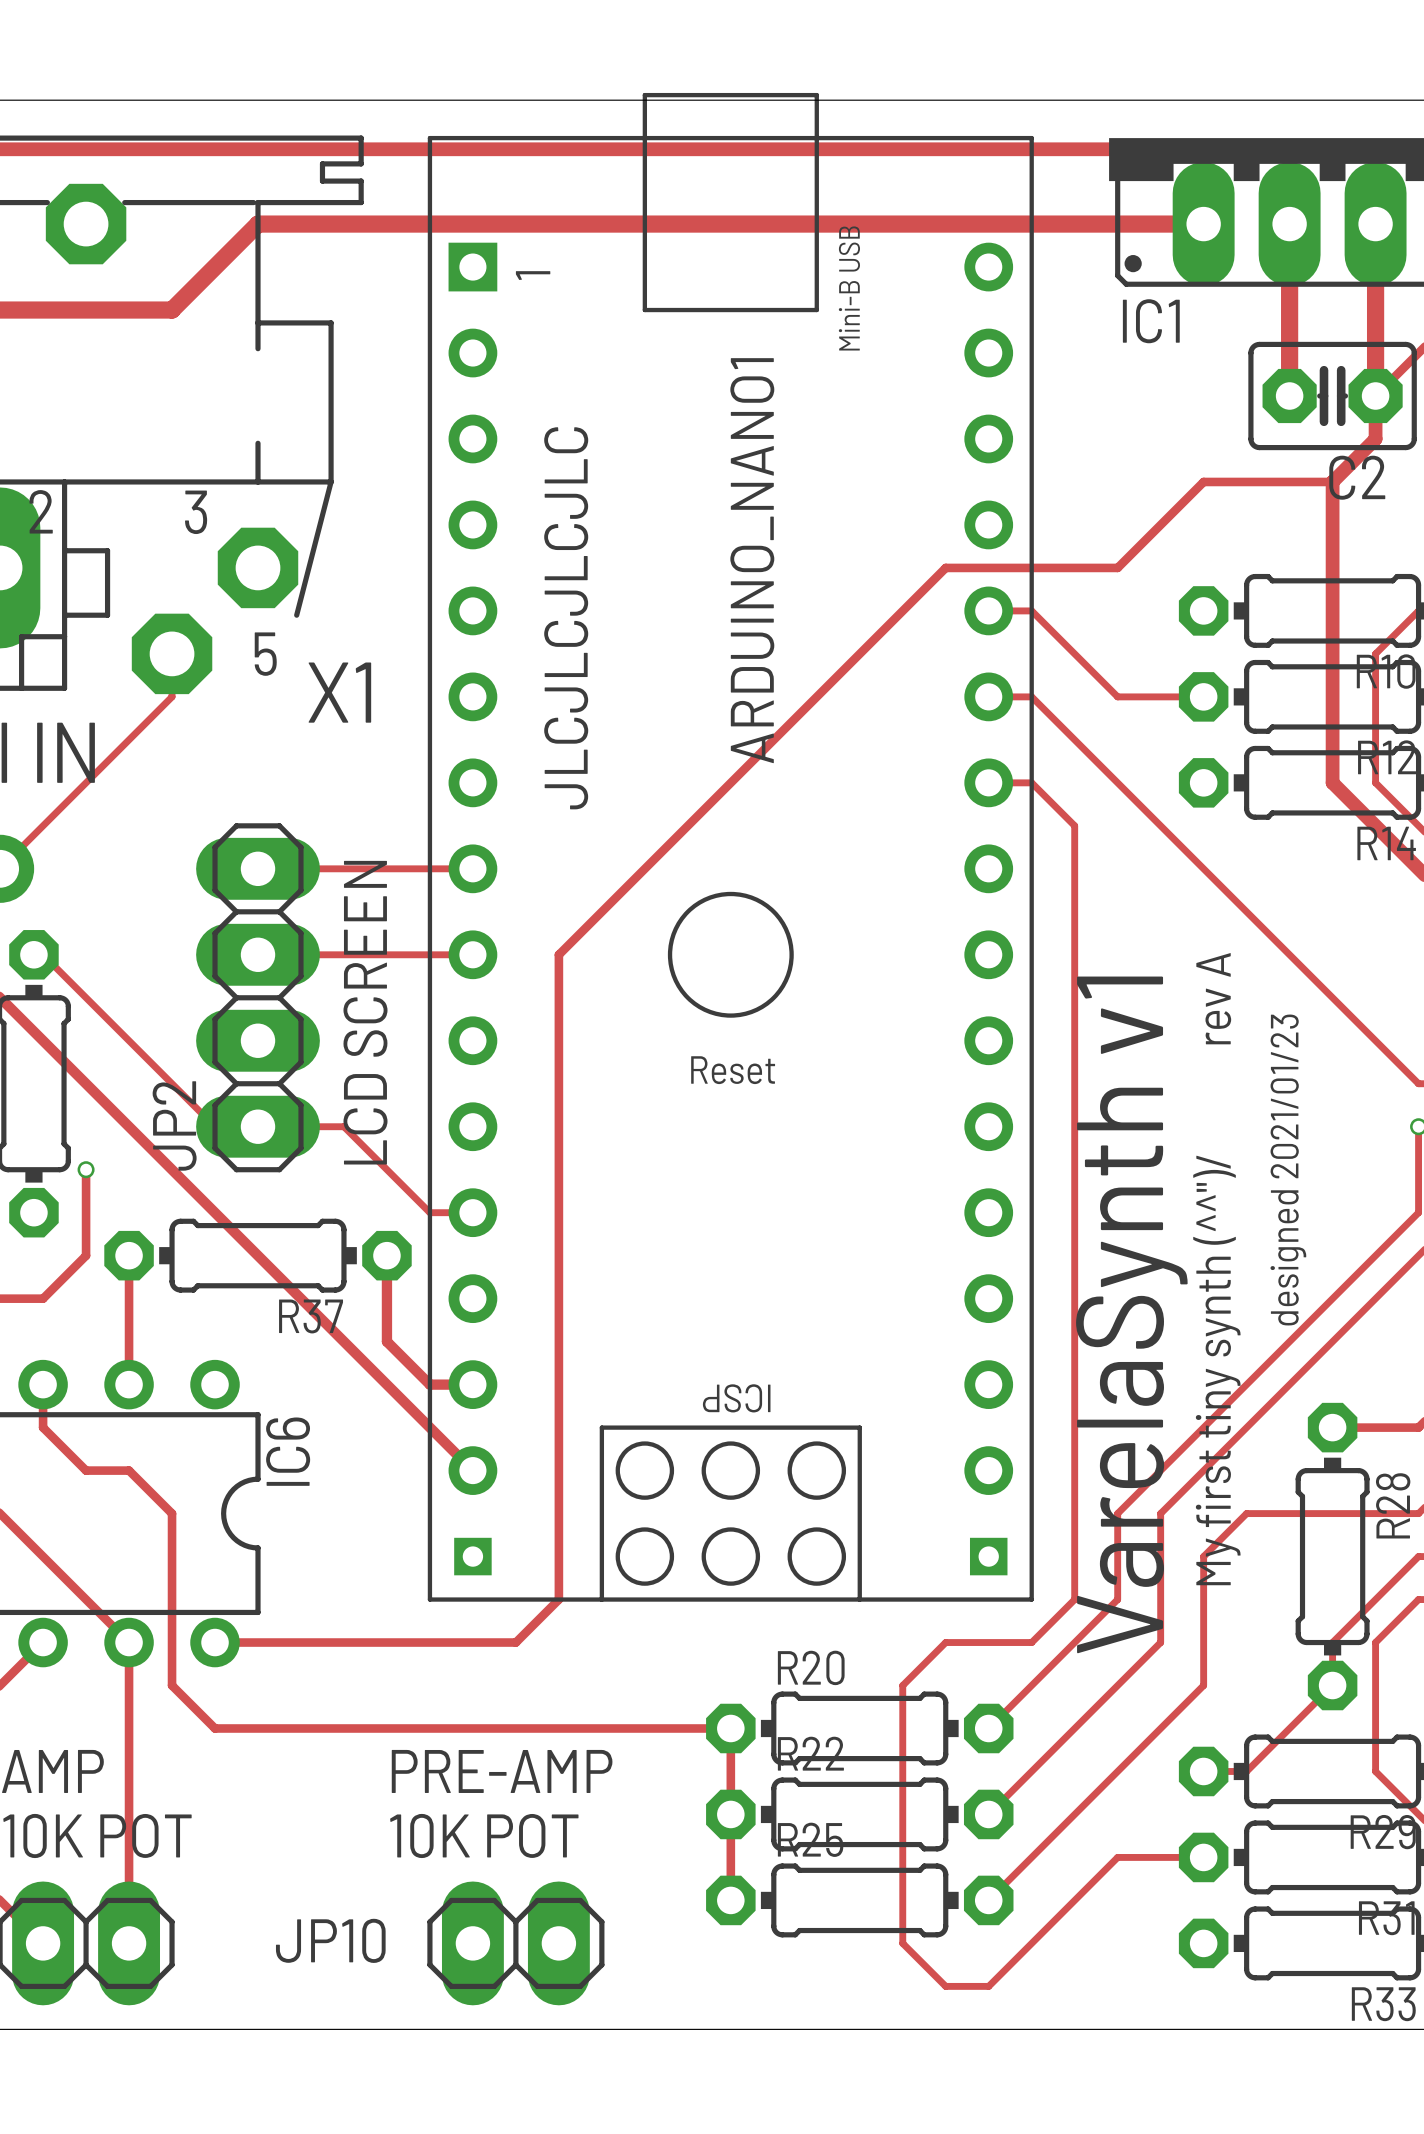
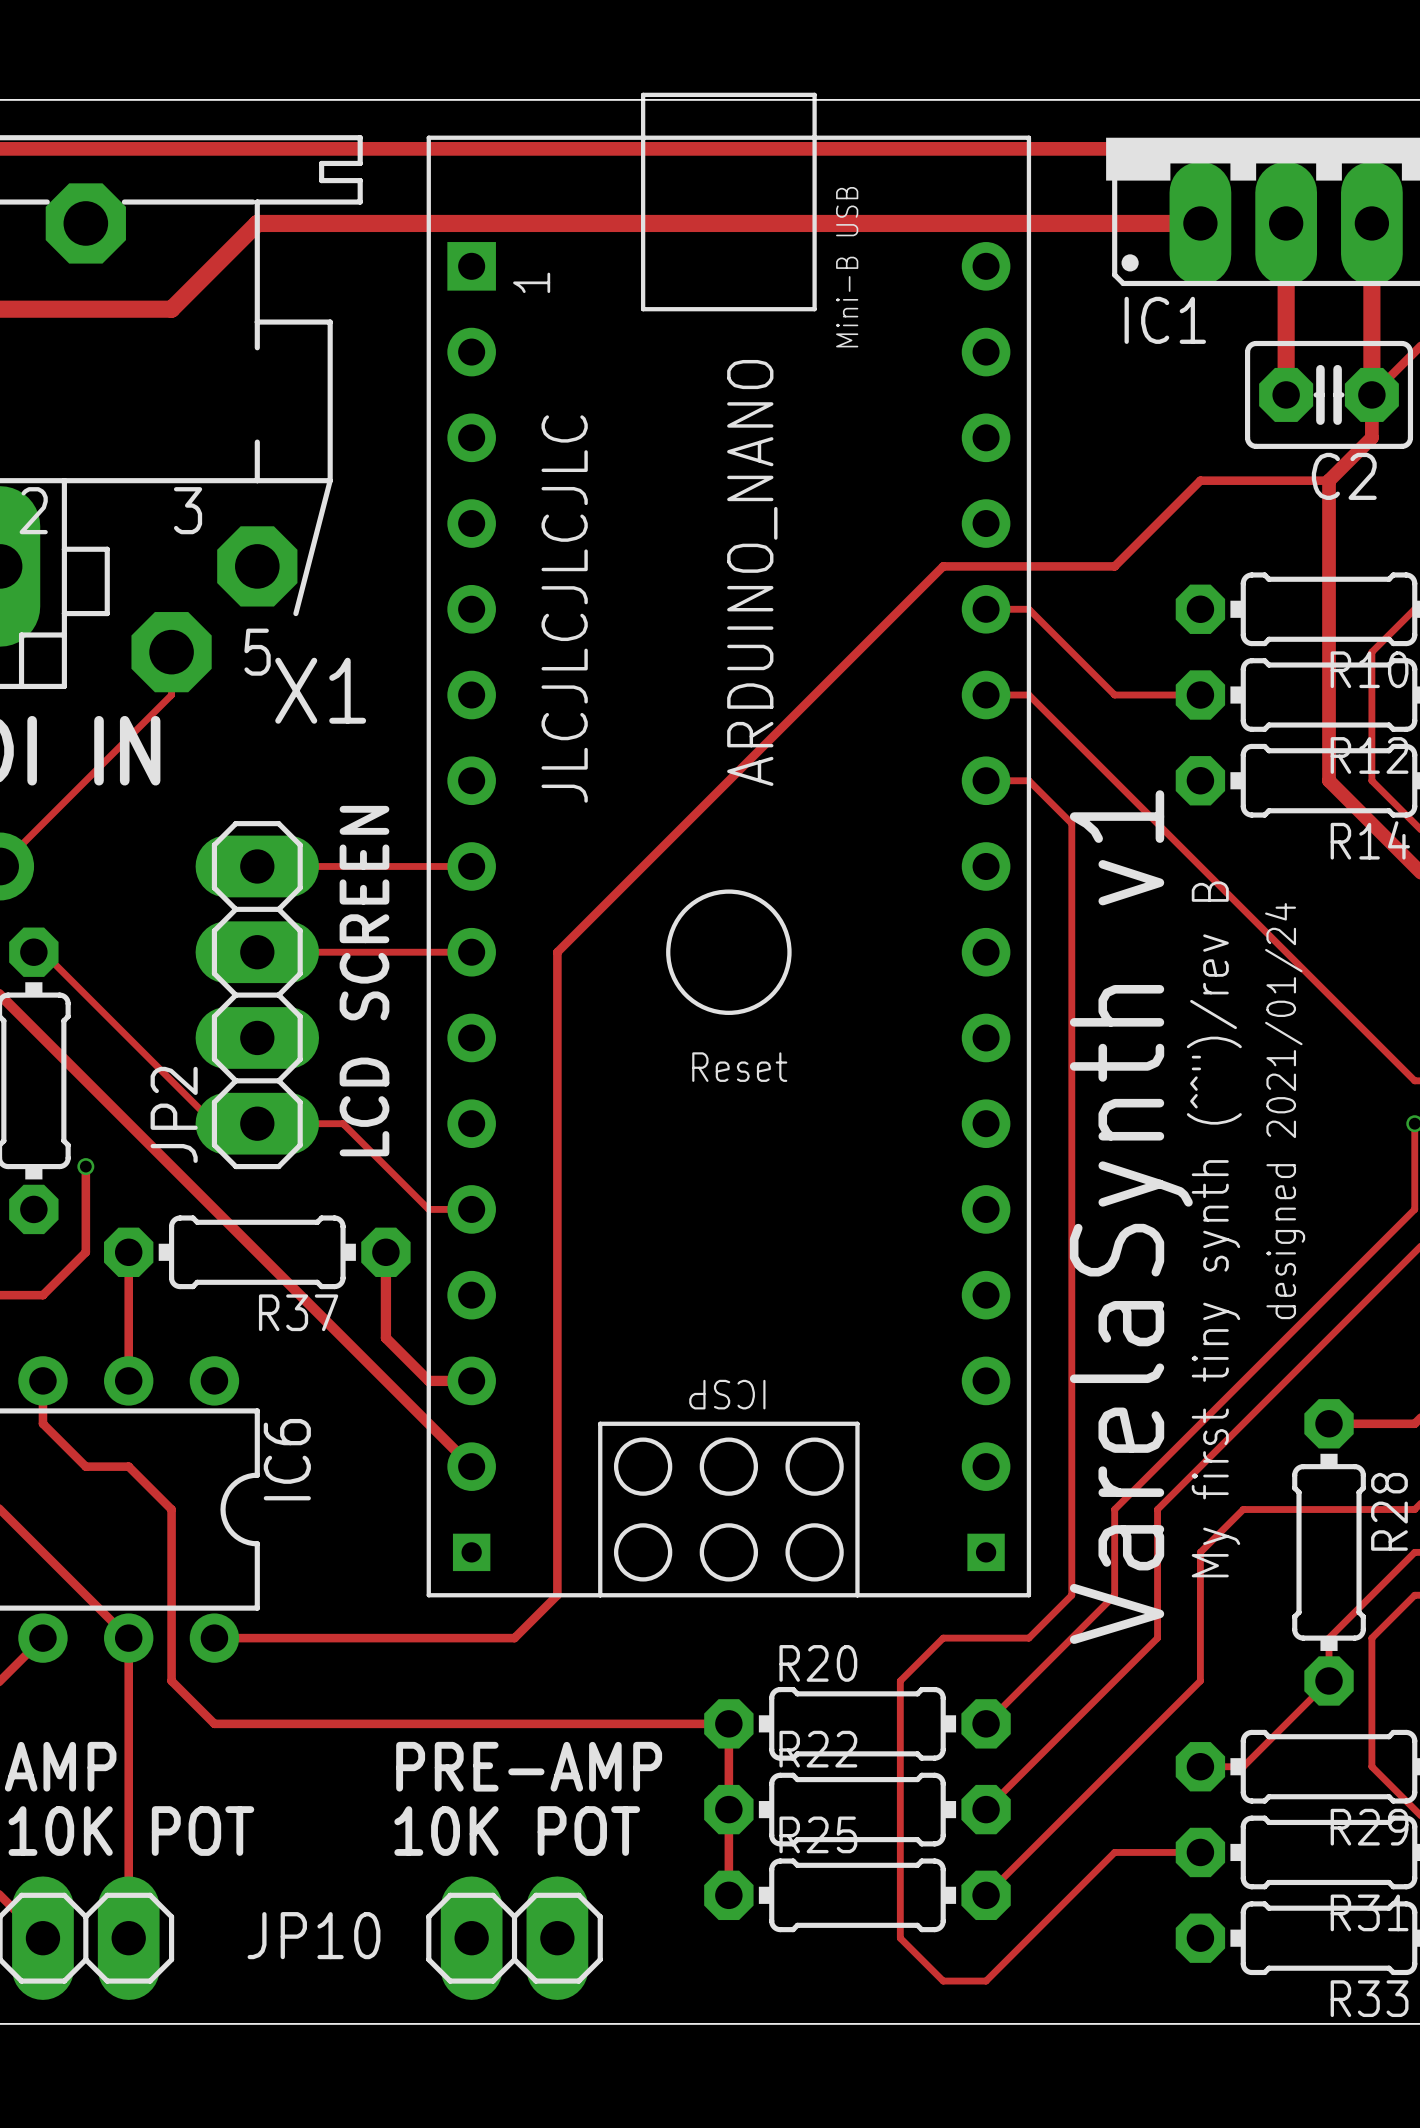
ARDUINO_NANO1 name: ARDUINO_NANO1 (752, 560) -> ARDUINO_NANO (752, 572)
text: rev A (1213, 998) -> rev B (1210, 937)
text: designed 2021/01/23 (1288, 1170) -> designed 2021/01/24 (1285, 1111)

